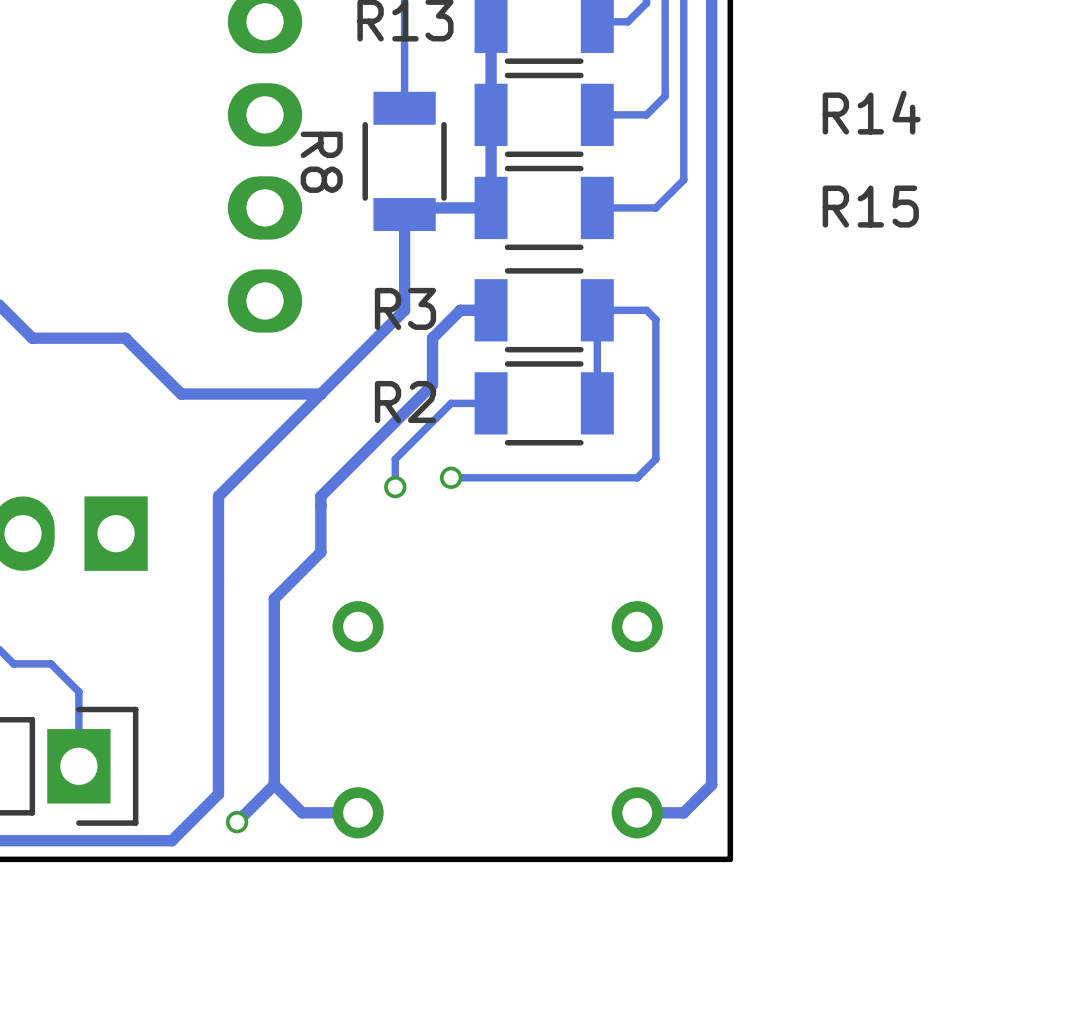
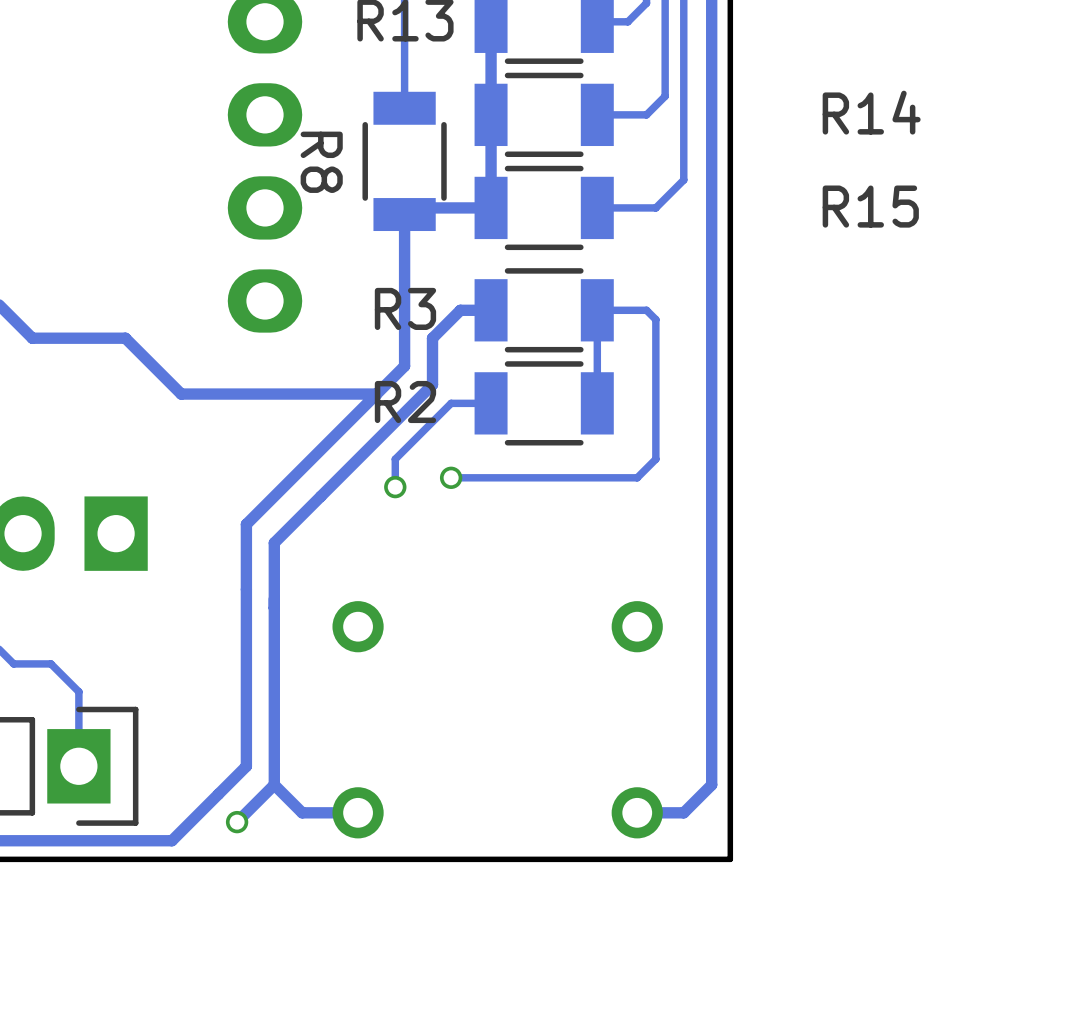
track: (404, 310) (218, 496) (218, 794) -> (404, 310) (404, 366) (246, 524) (246, 766) (218, 794)
track: none -> (376, 394) (320, 394)
track: (320, 496) (320, 552) (274, 598) -> (320, 496) (274, 542) (274, 598)

